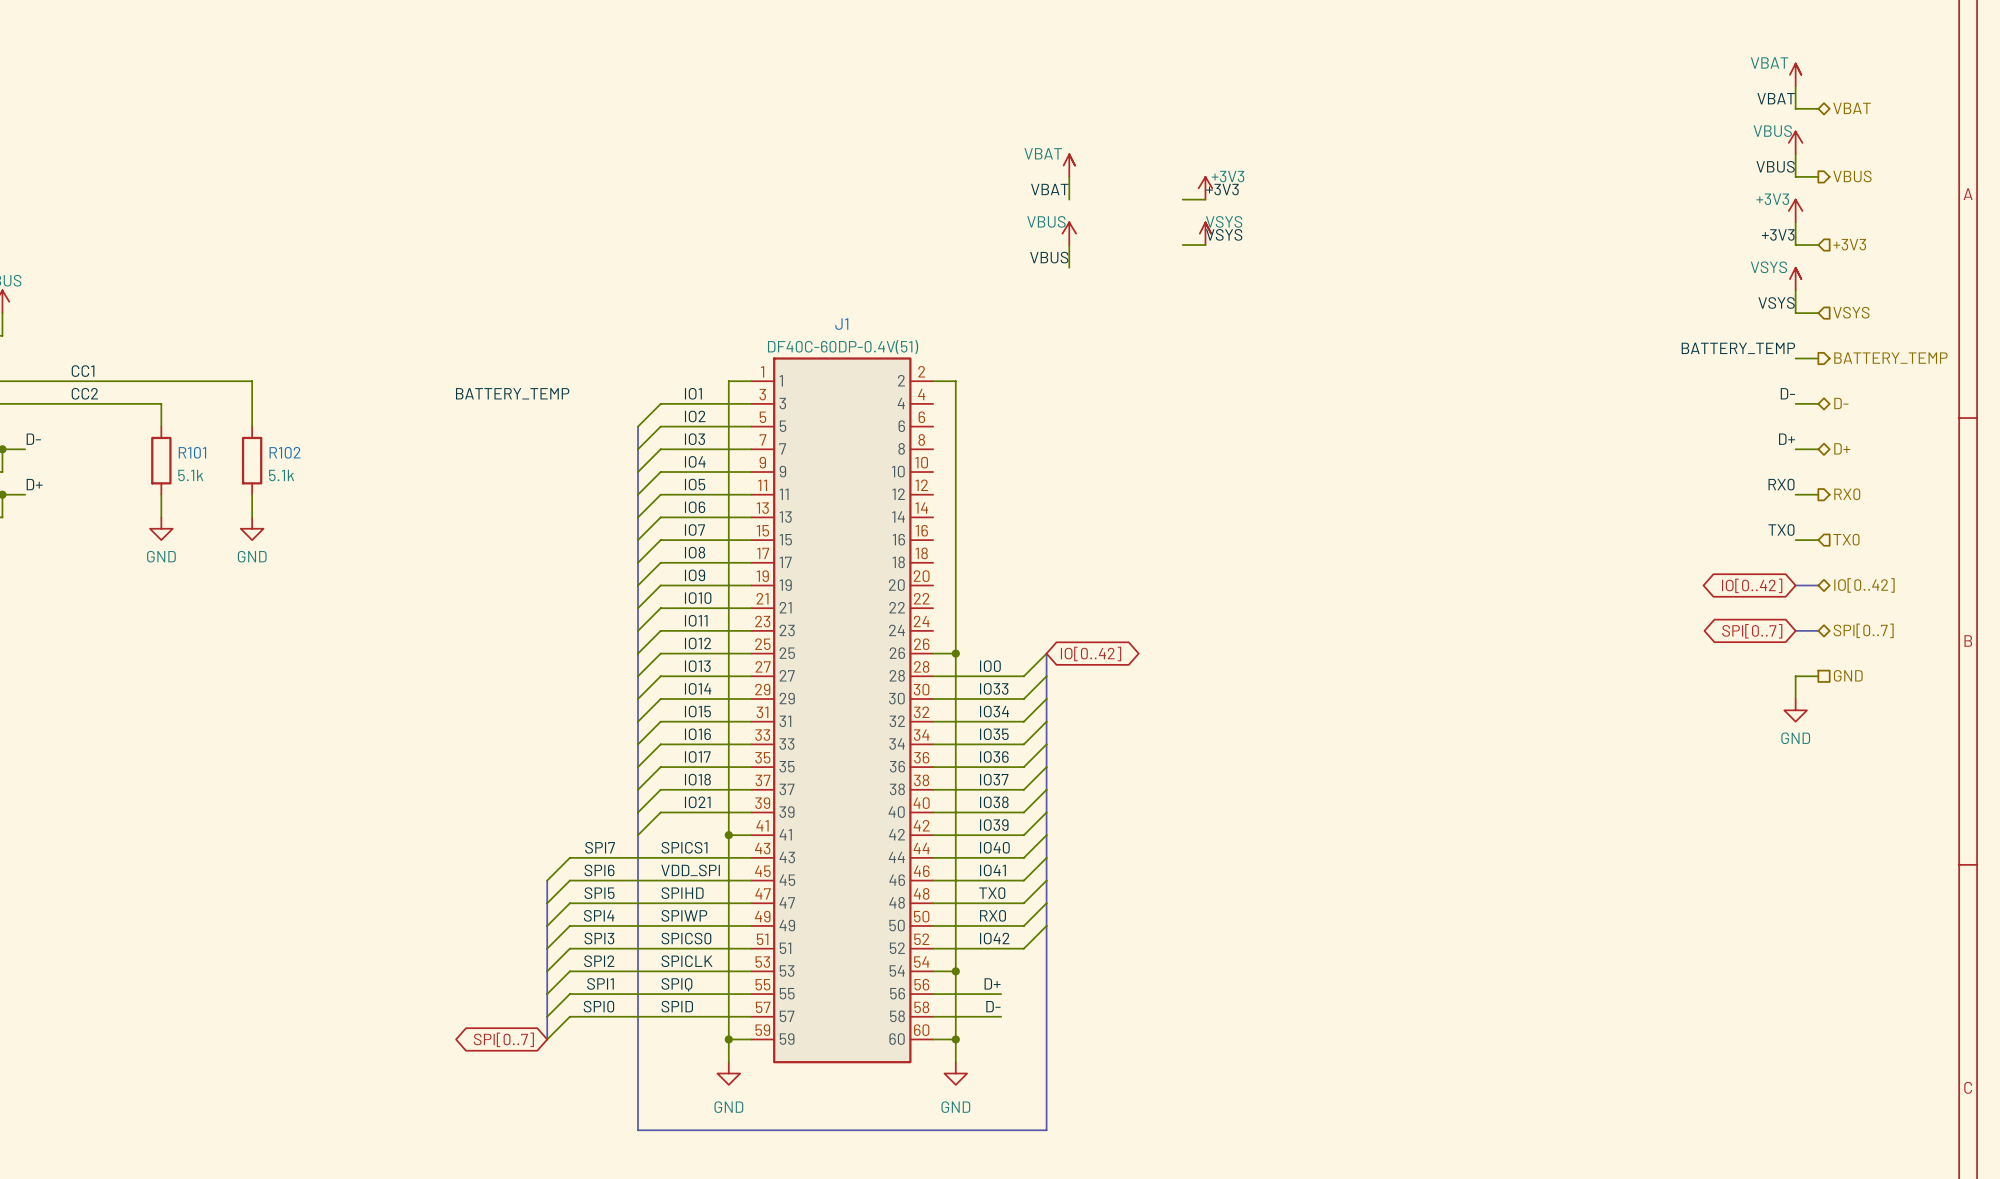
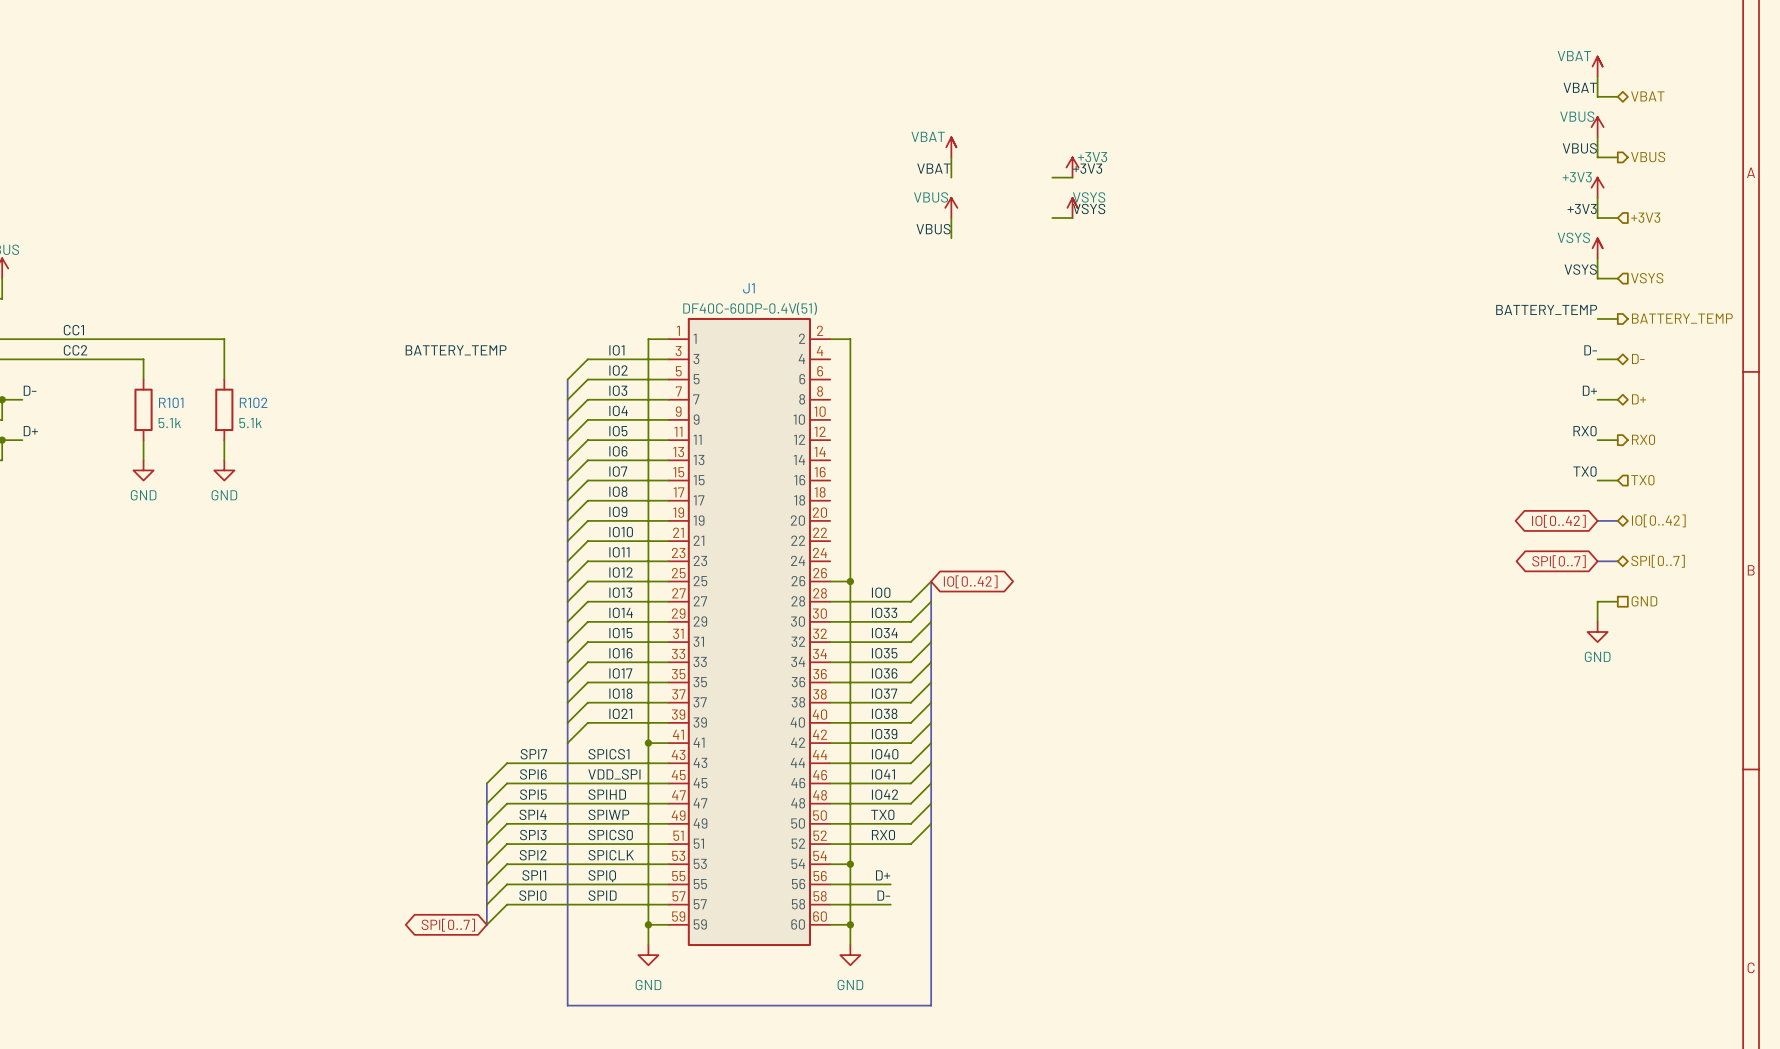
label: TX0 (992, 893) -> IO42 (885, 794)
label: RX0 (992, 915) -> TX0 (882, 814)
label: IO42 (994, 938) -> RX0 (883, 835)

